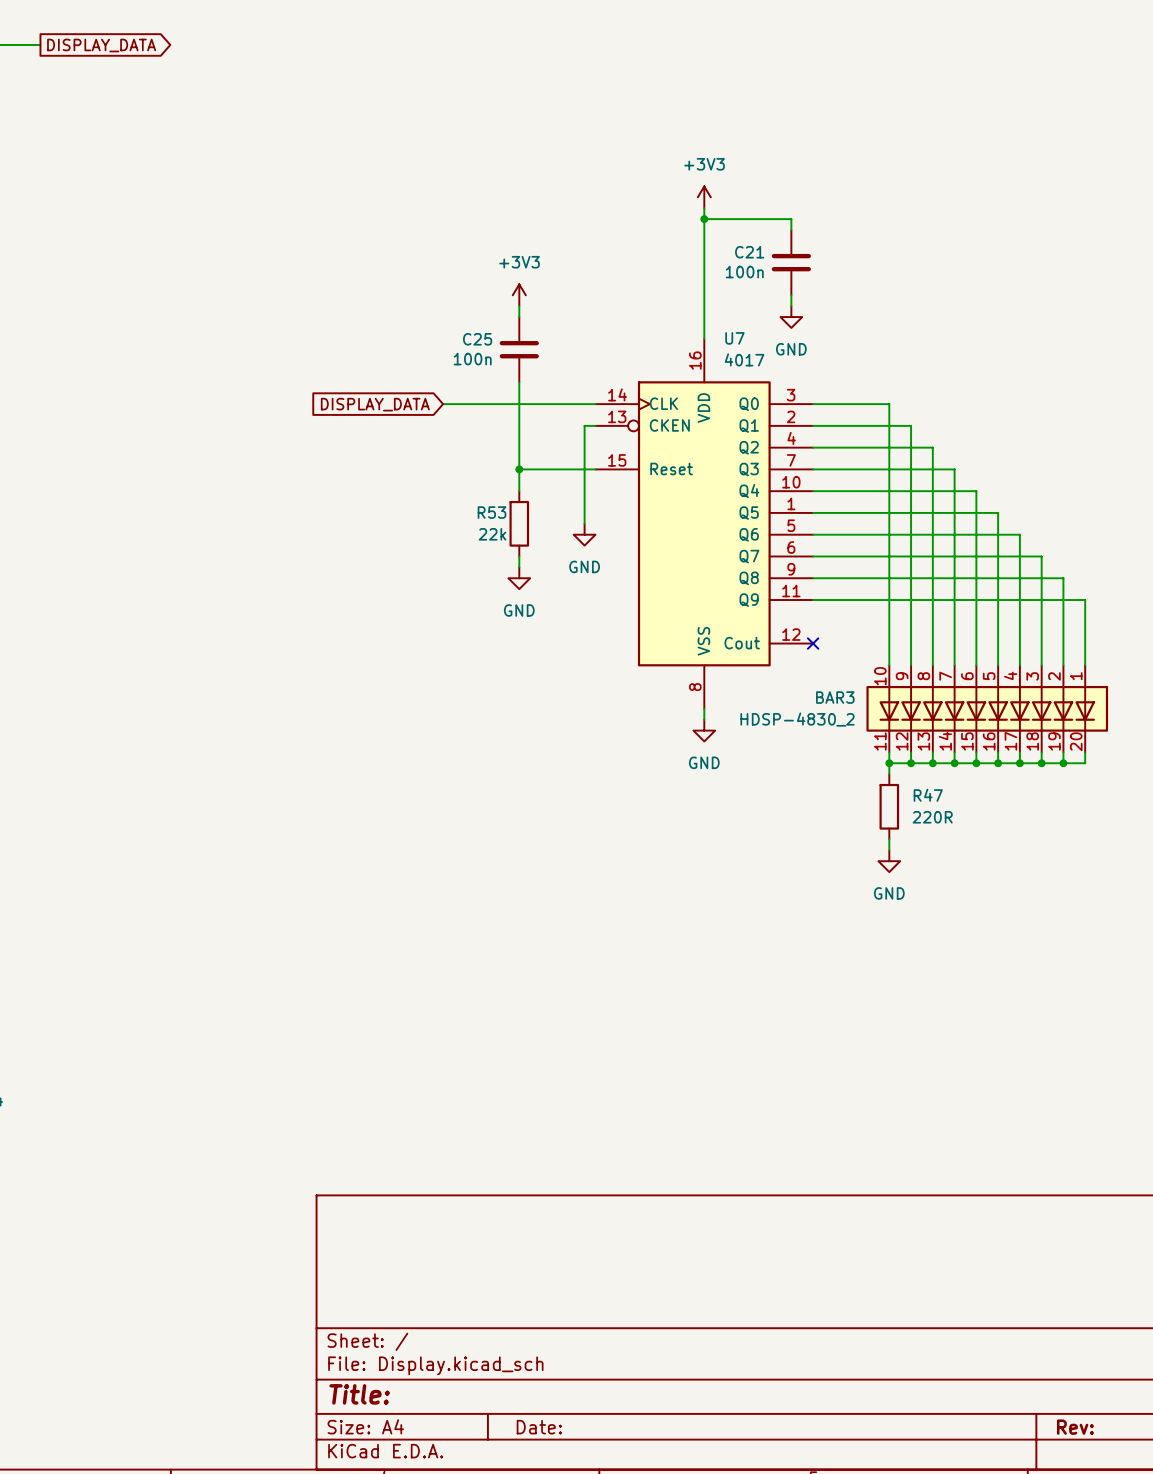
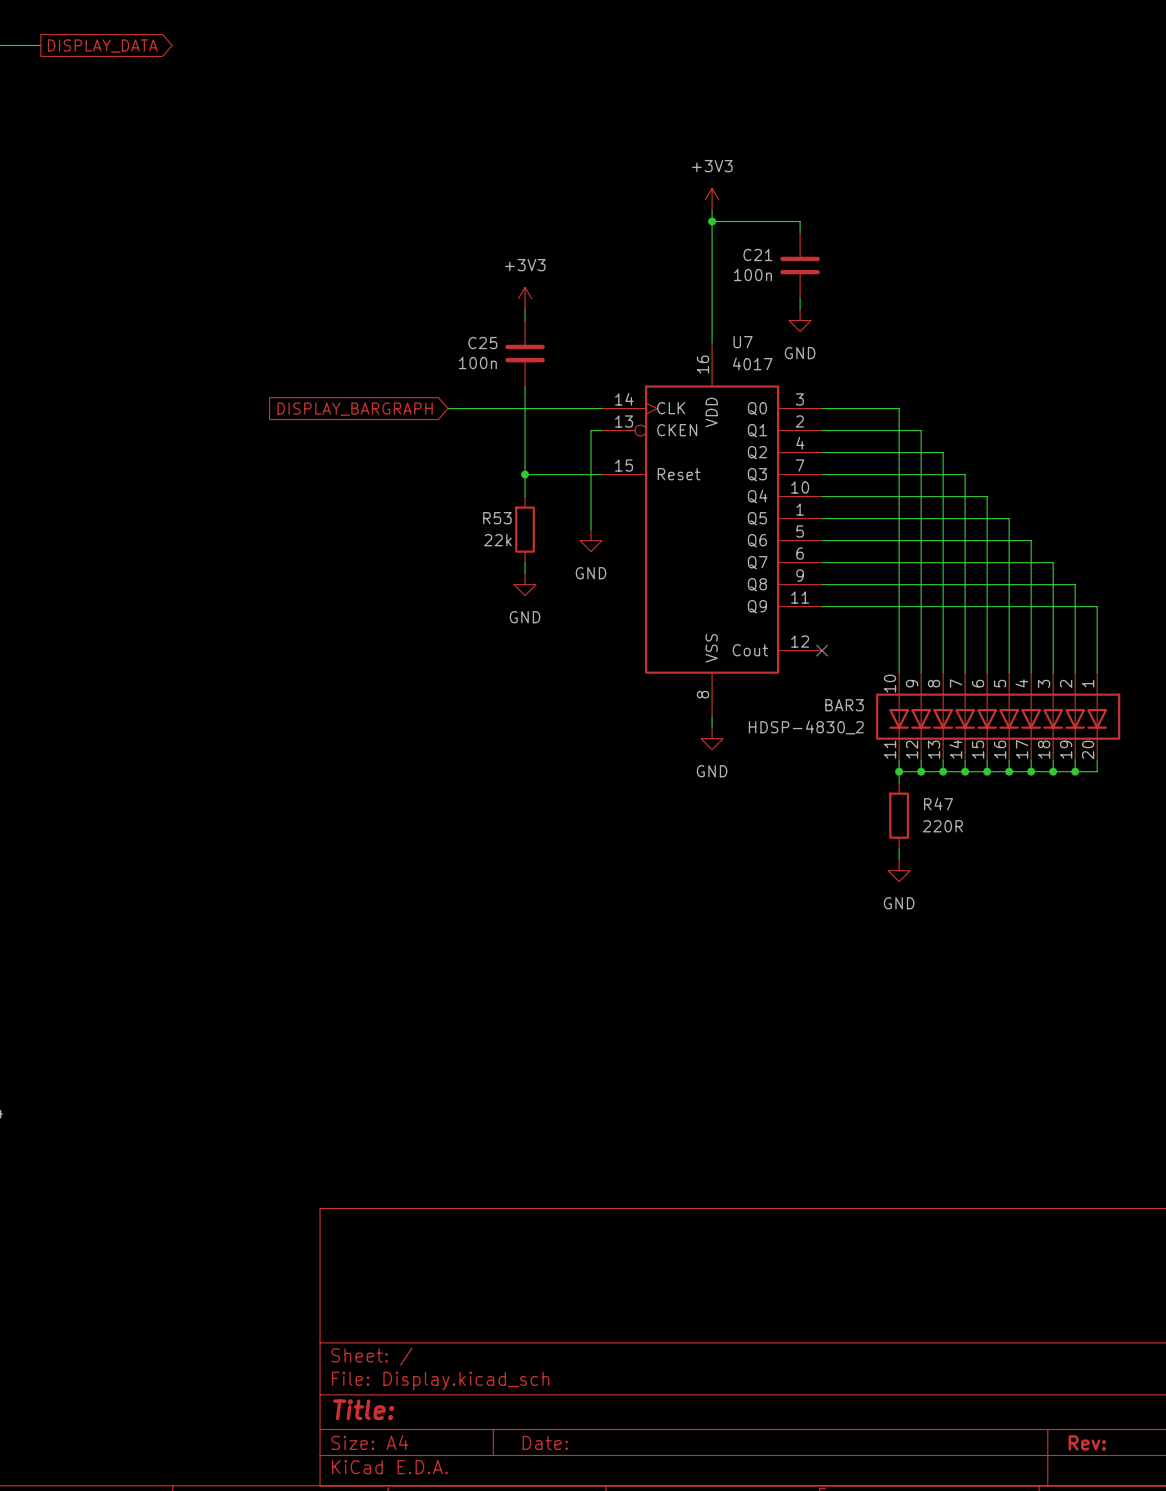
global label: DISPLAY_DATA (375, 404) -> DISPLAY_BARGRAPH (355, 409)

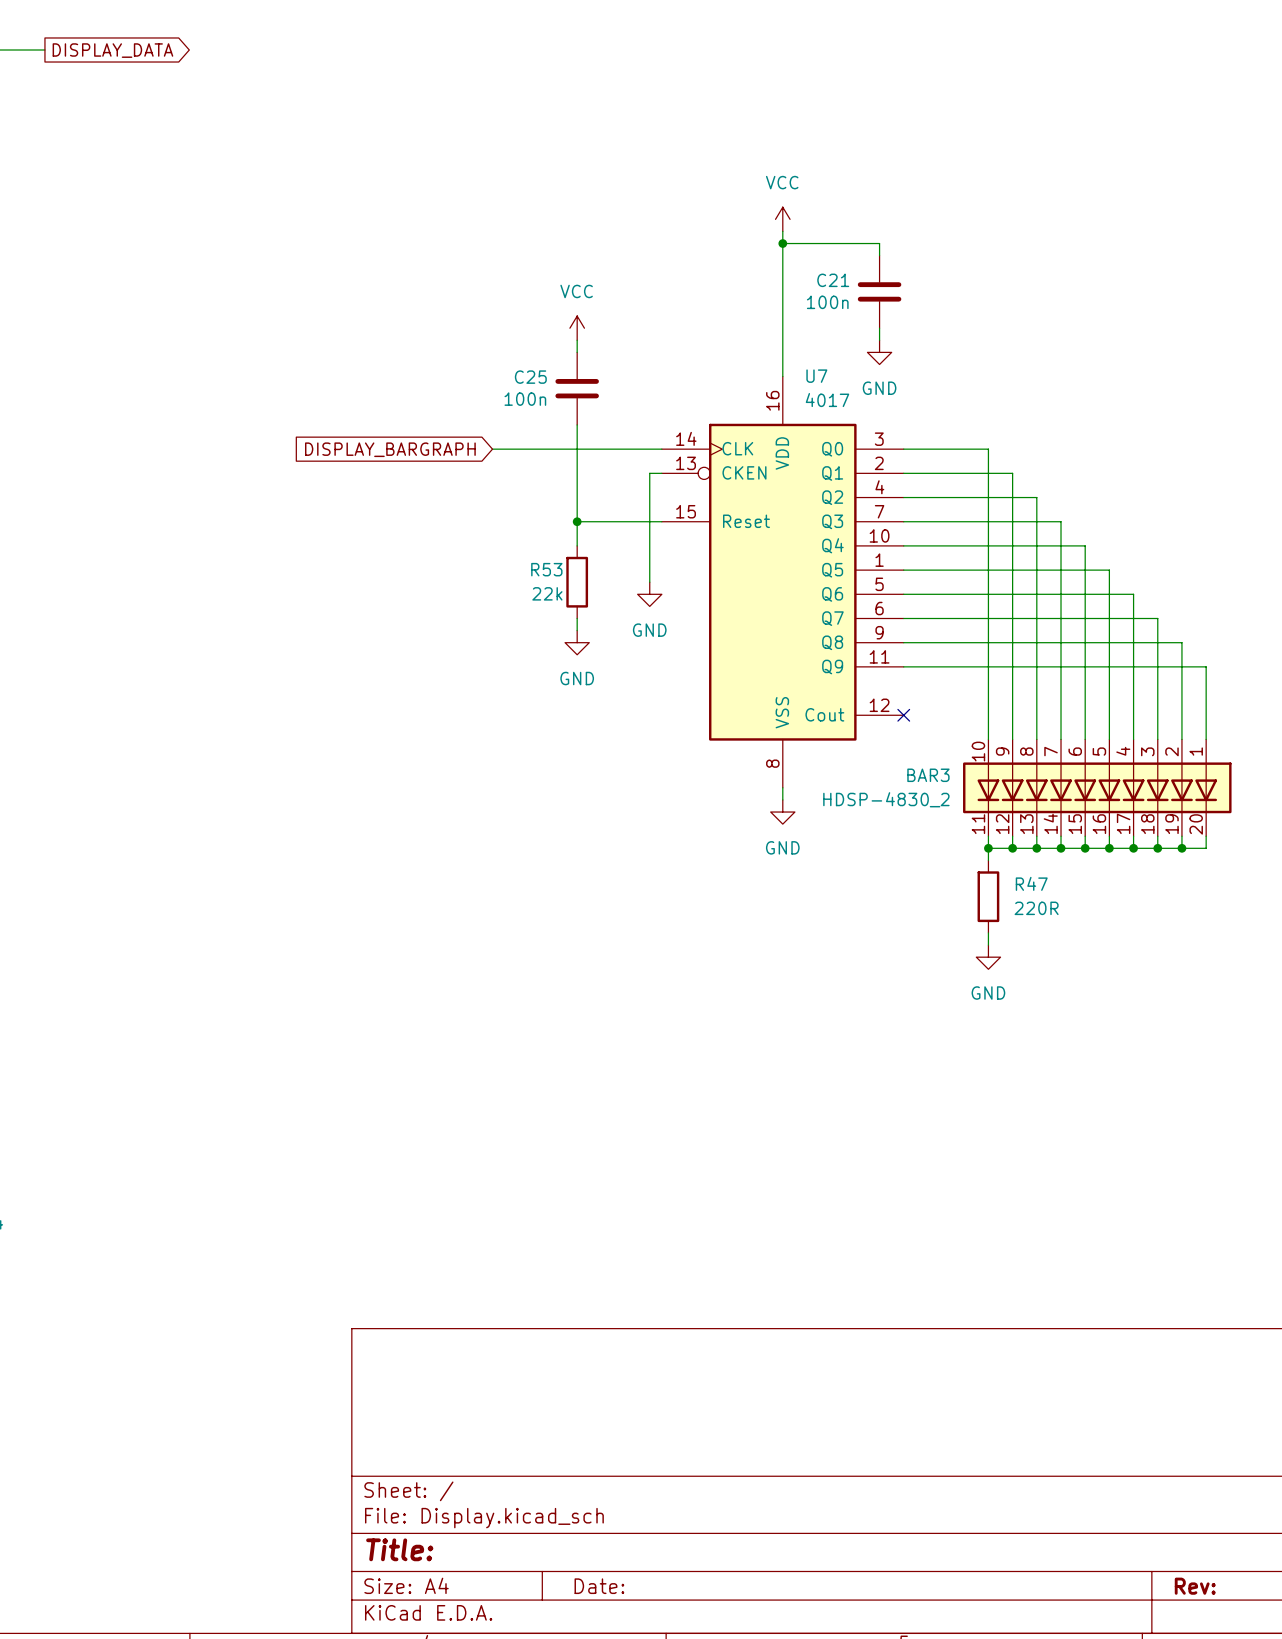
power symbol: +3V3 (712, 199) -> VCC (782, 219)
power symbol: +3V3 (525, 298) -> VCC (577, 328)

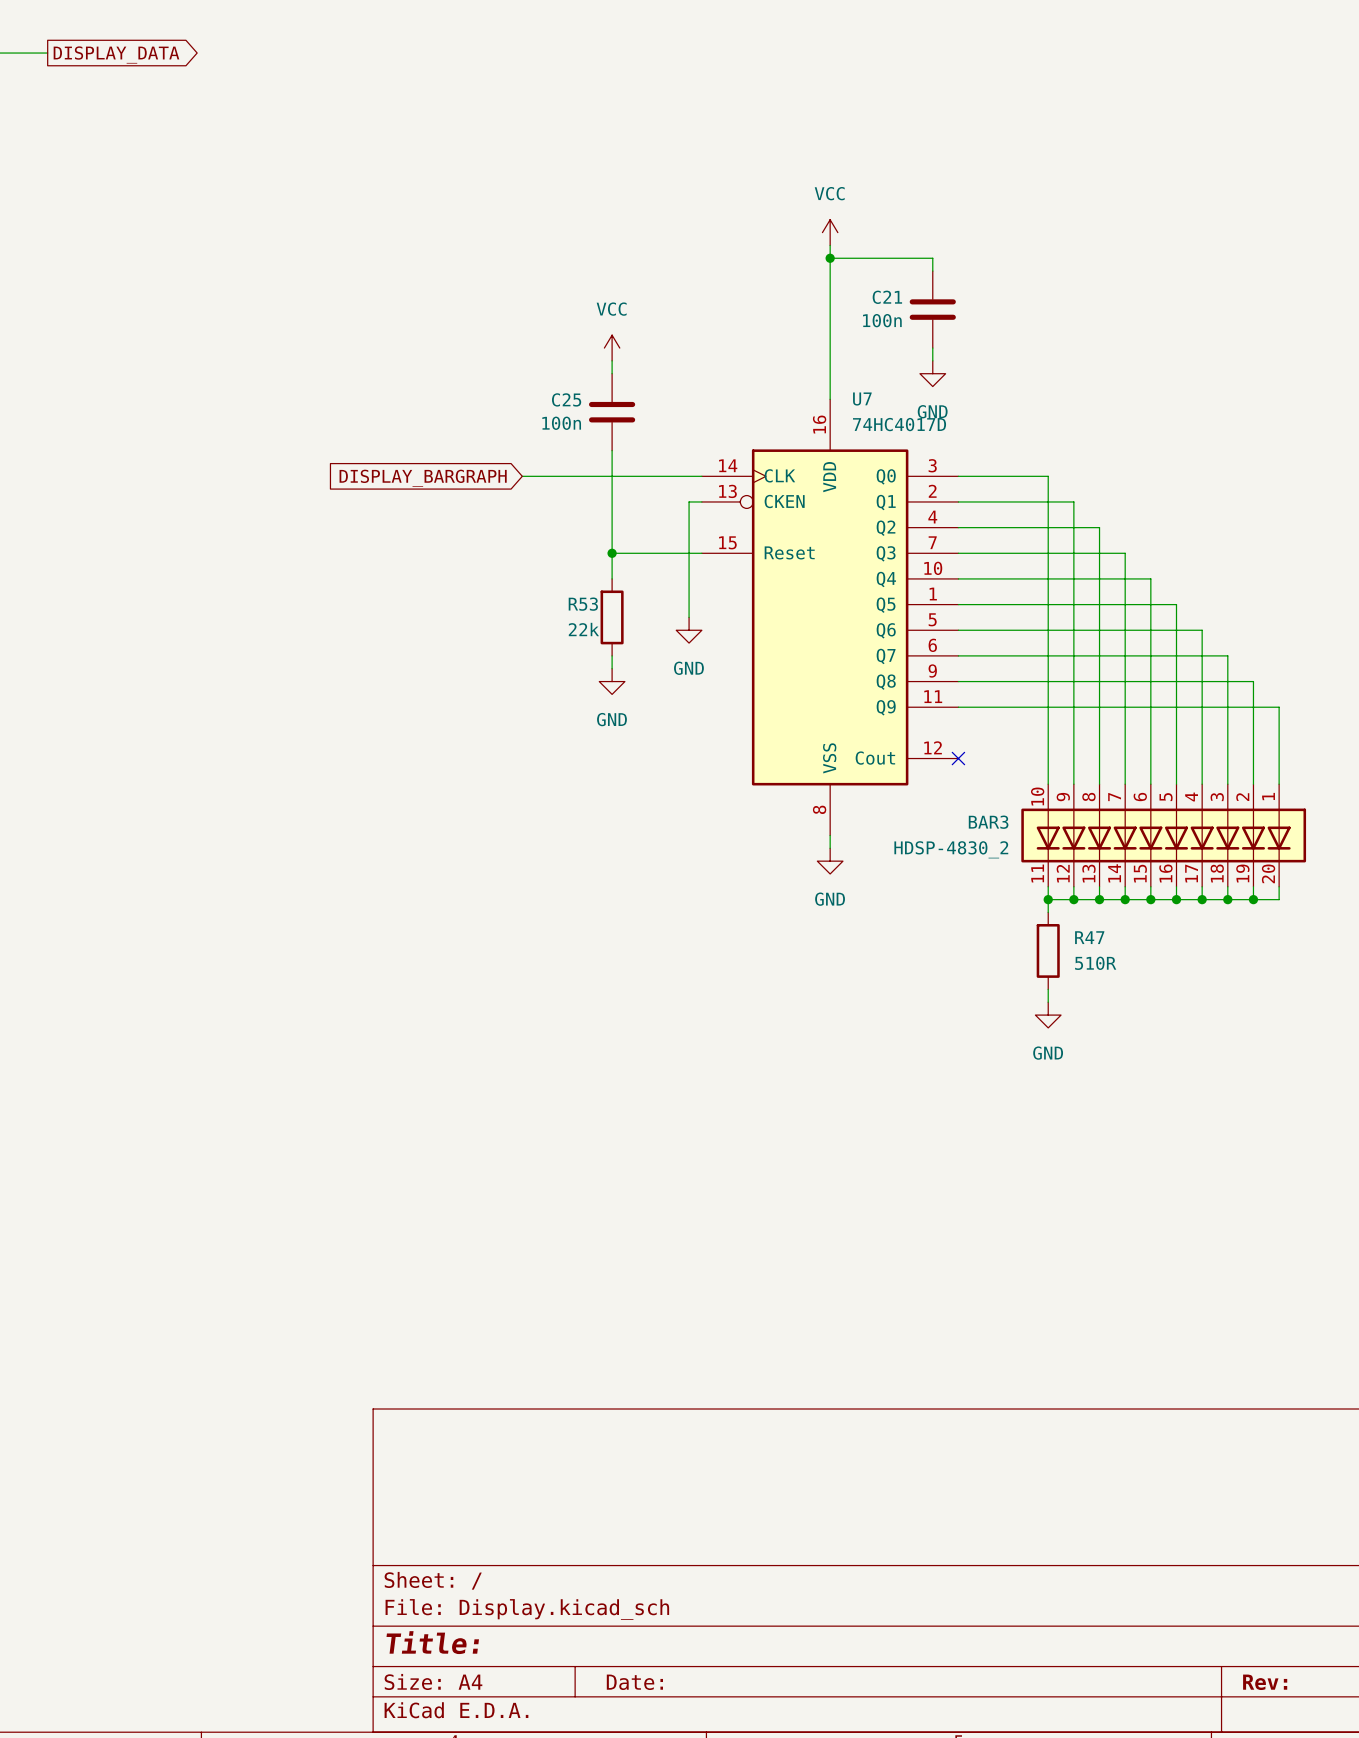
U7 value: 4017 (827, 400) -> 74HC4017D (899, 424)
R47 value: 220R (1036, 908) -> 510R (1095, 963)

